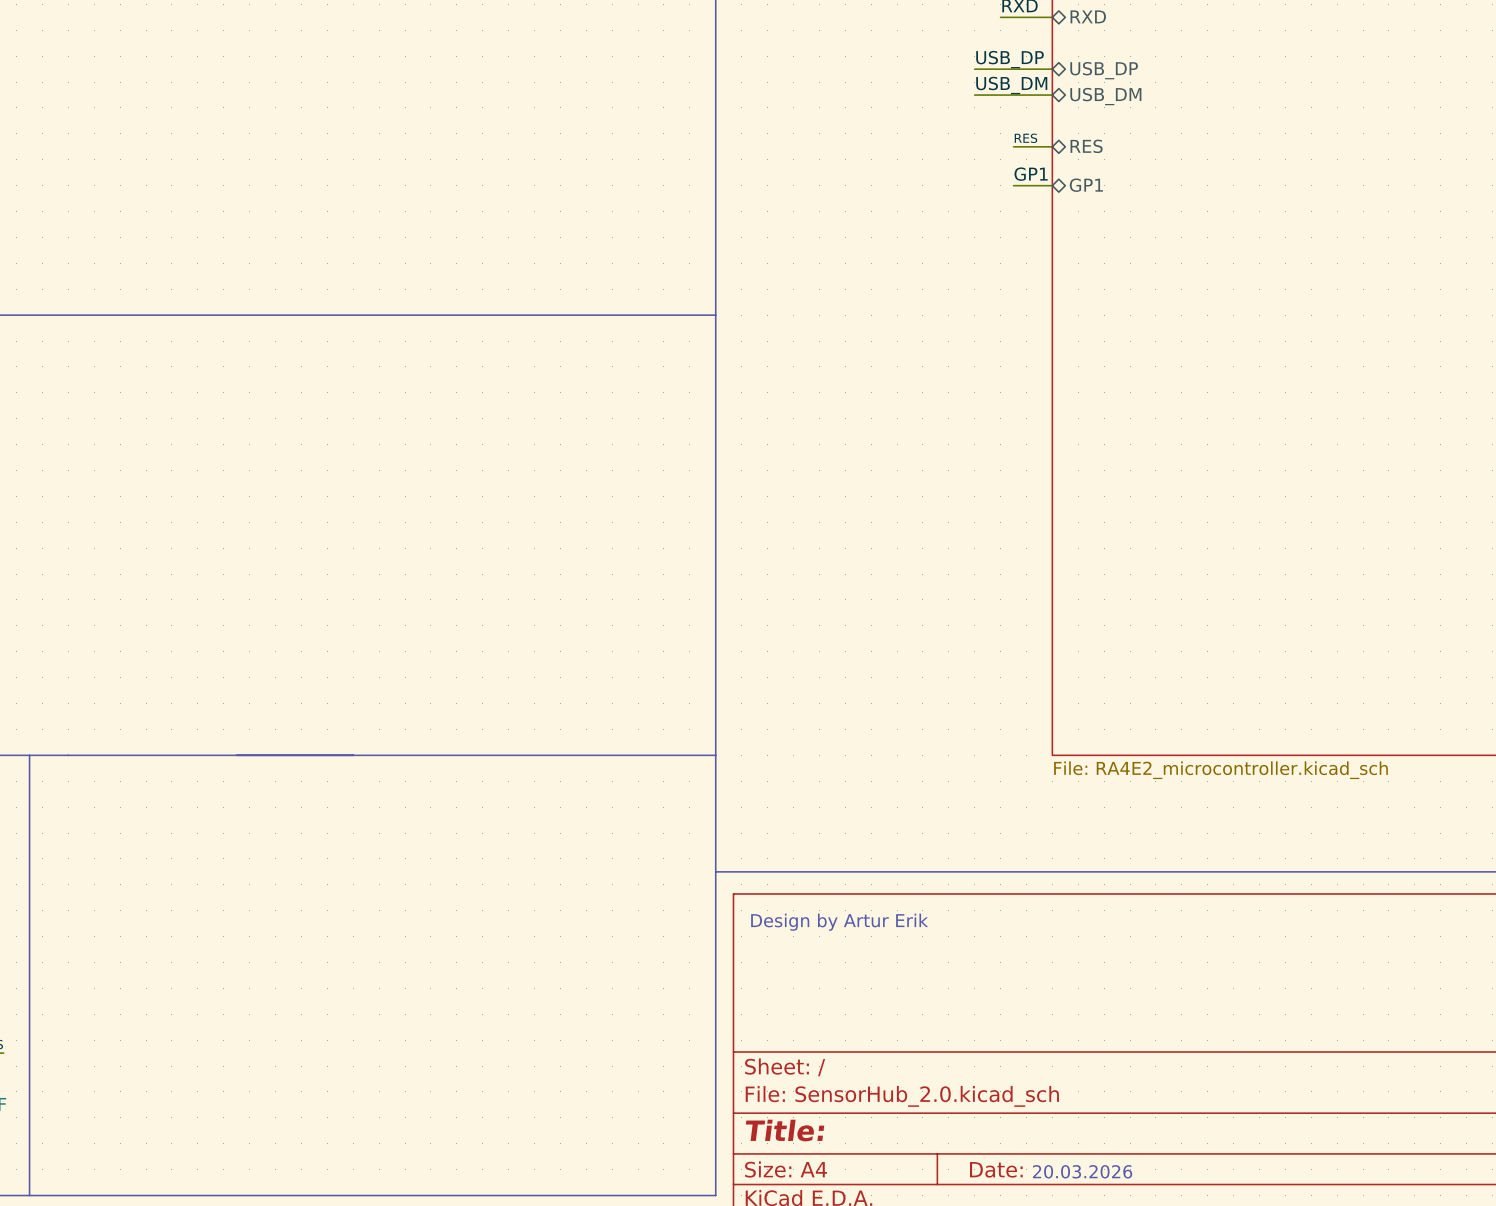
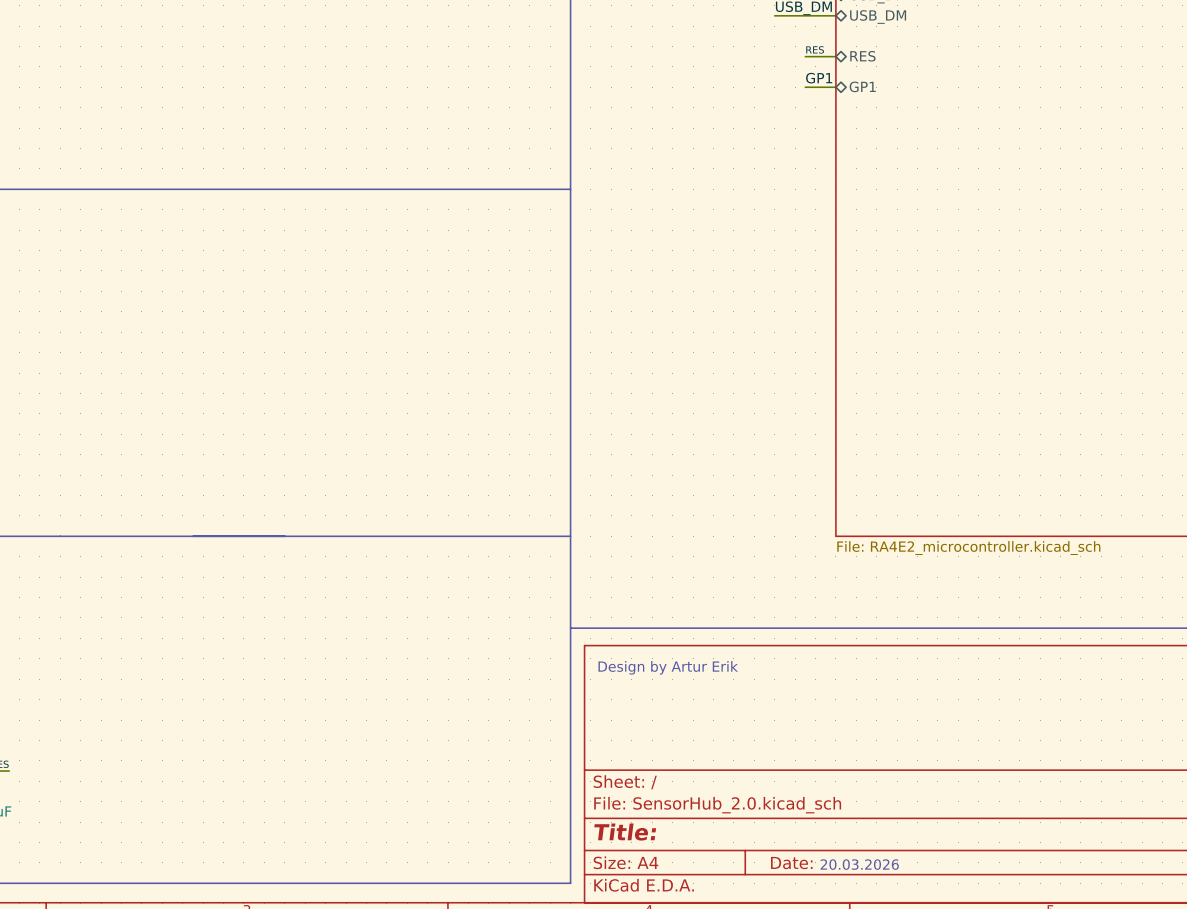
line: (29, 755) (29, 1195) -> none

